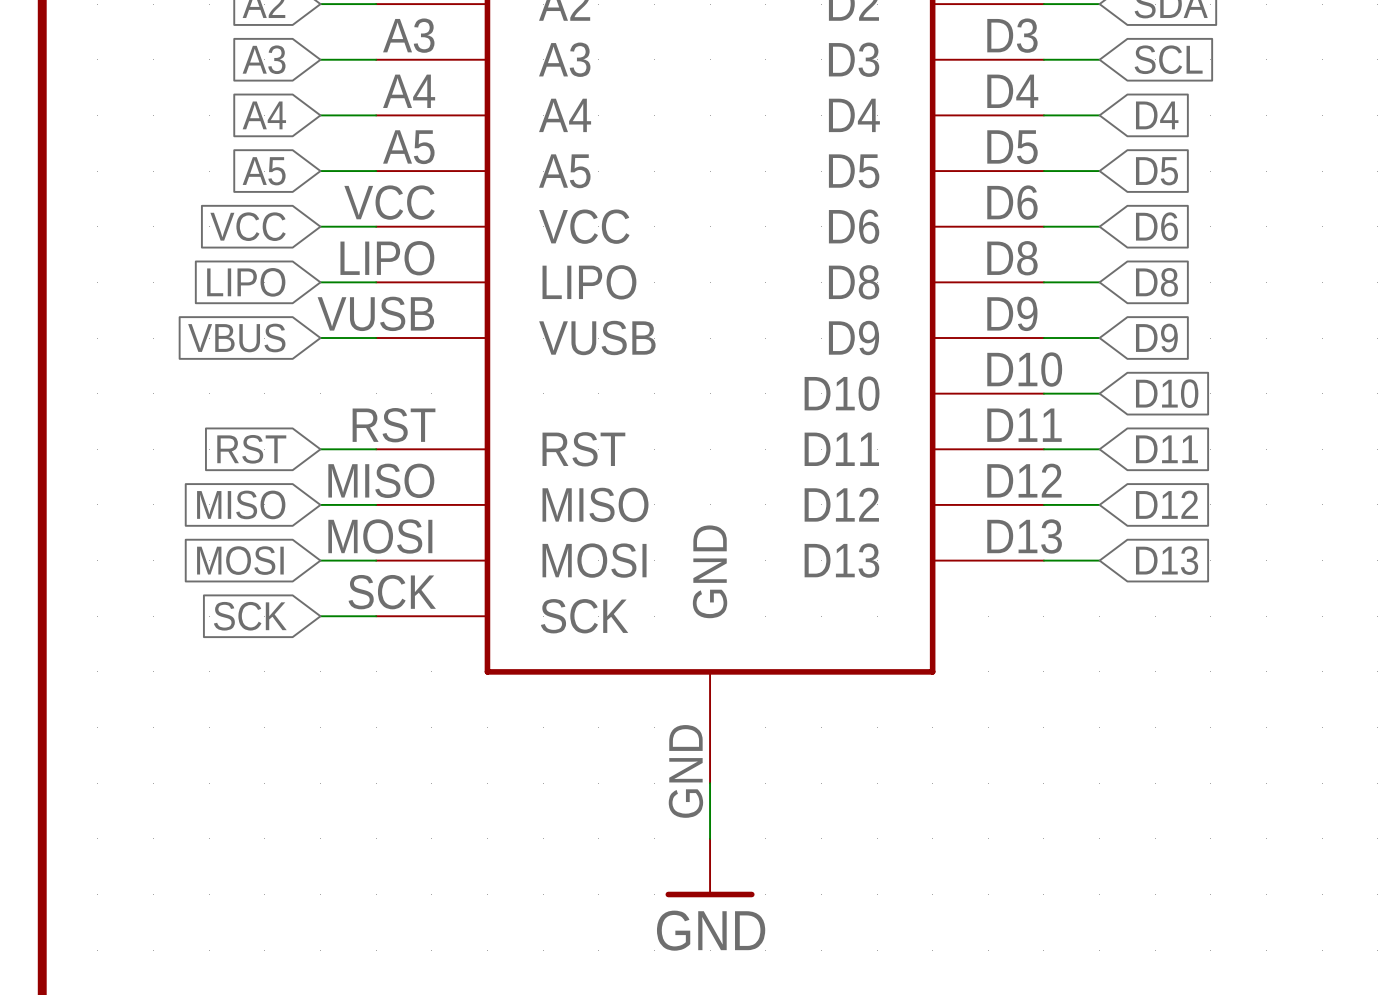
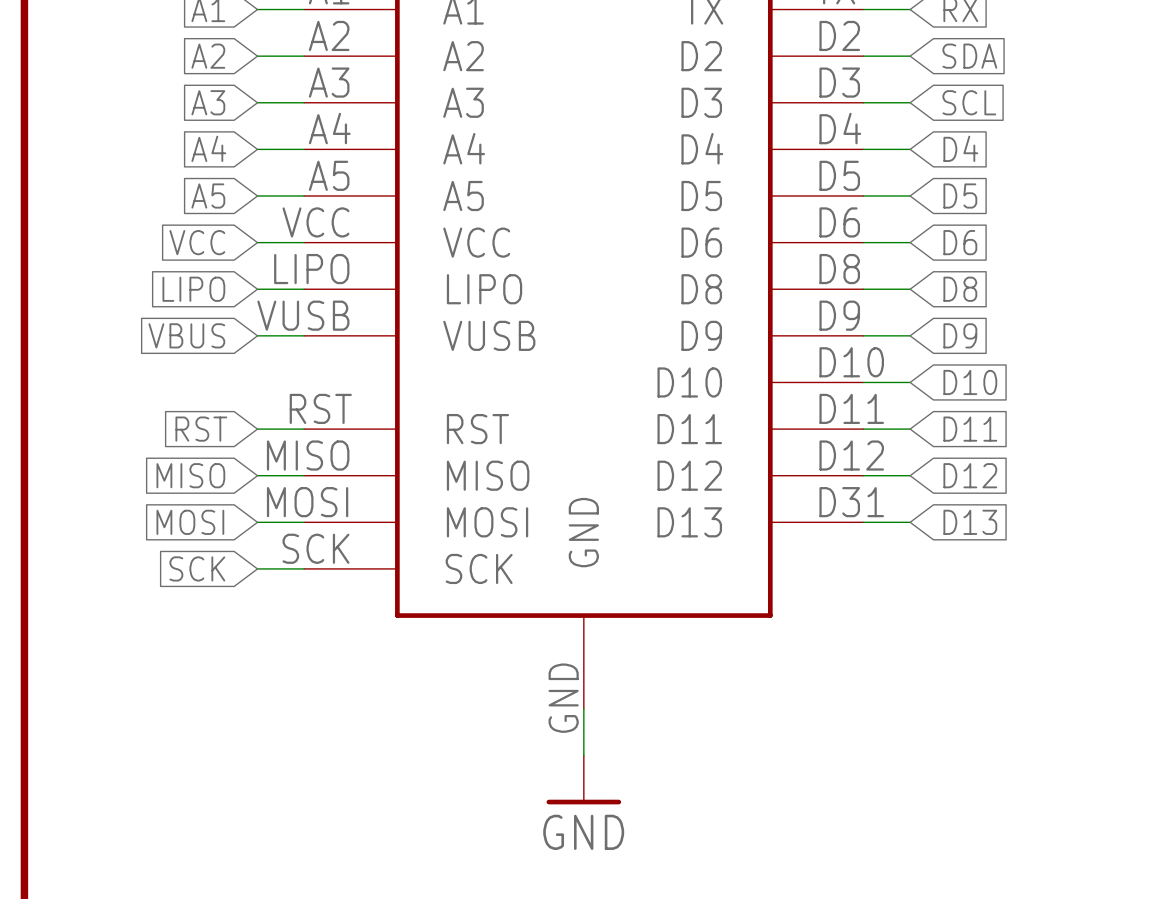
part pin number: D13 (1024, 536) -> D31 (851, 502)

